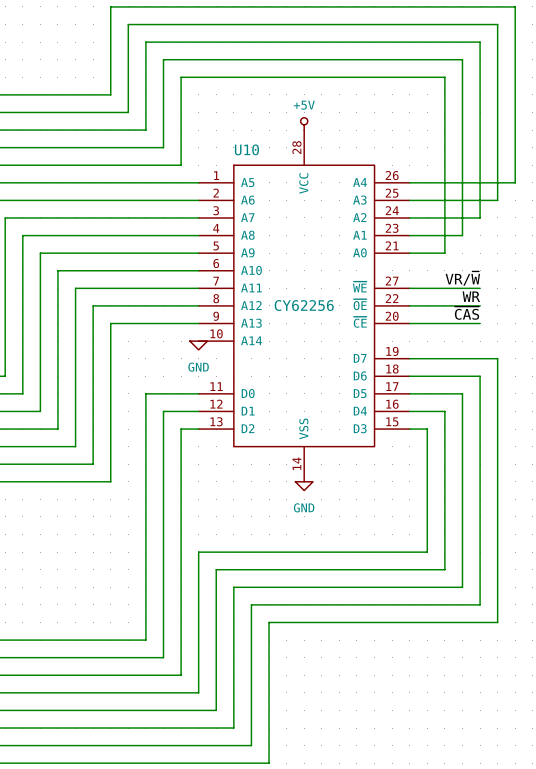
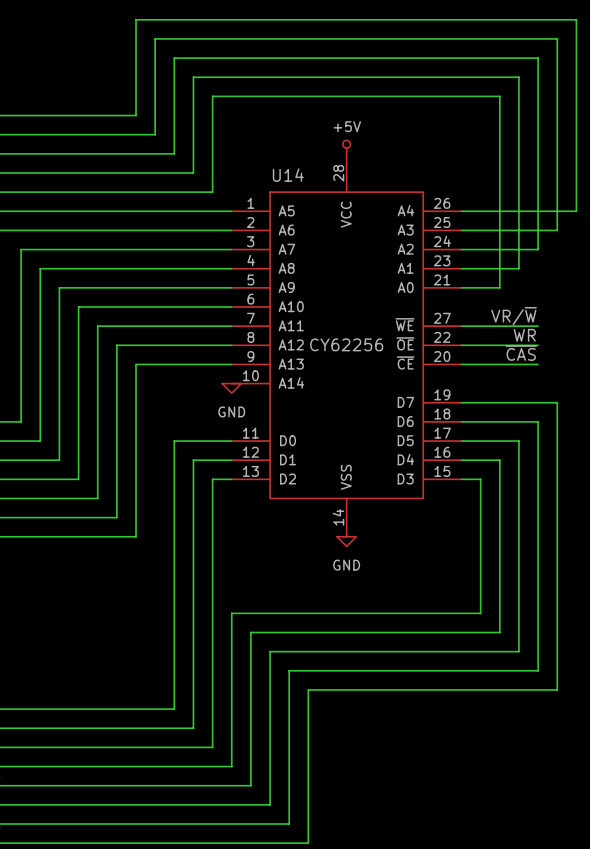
U10 name: U10 (246, 149) -> U14 (288, 175)

